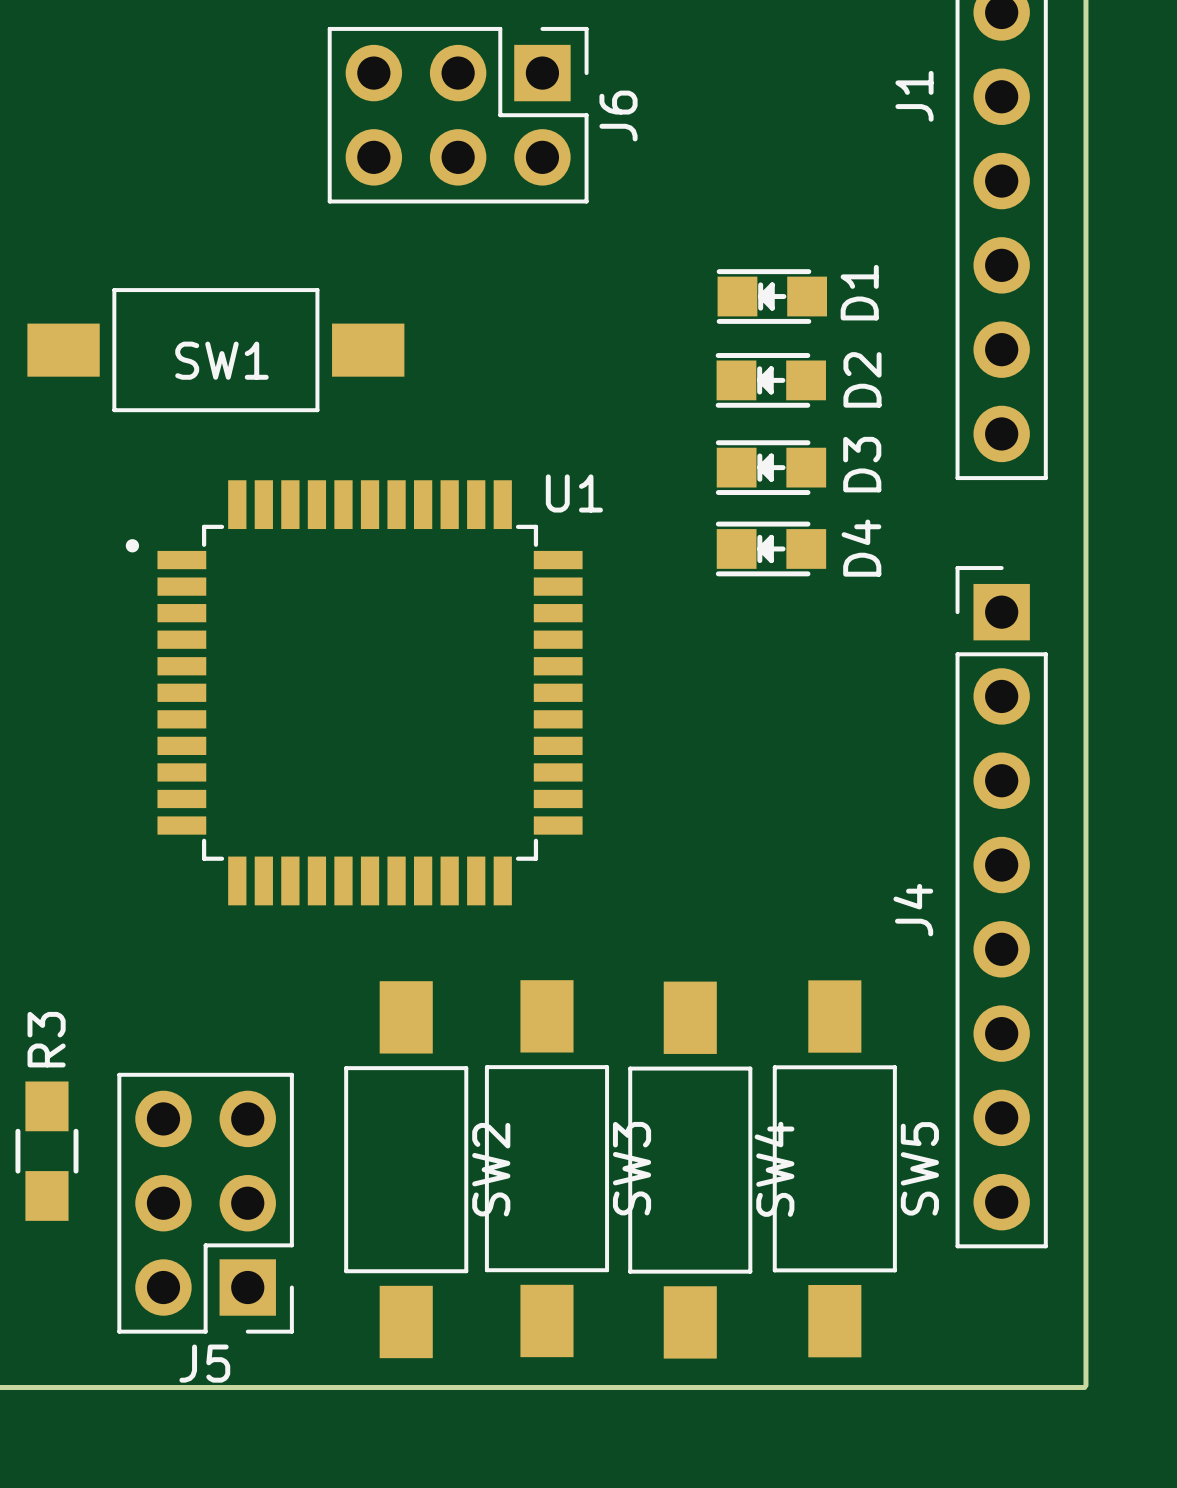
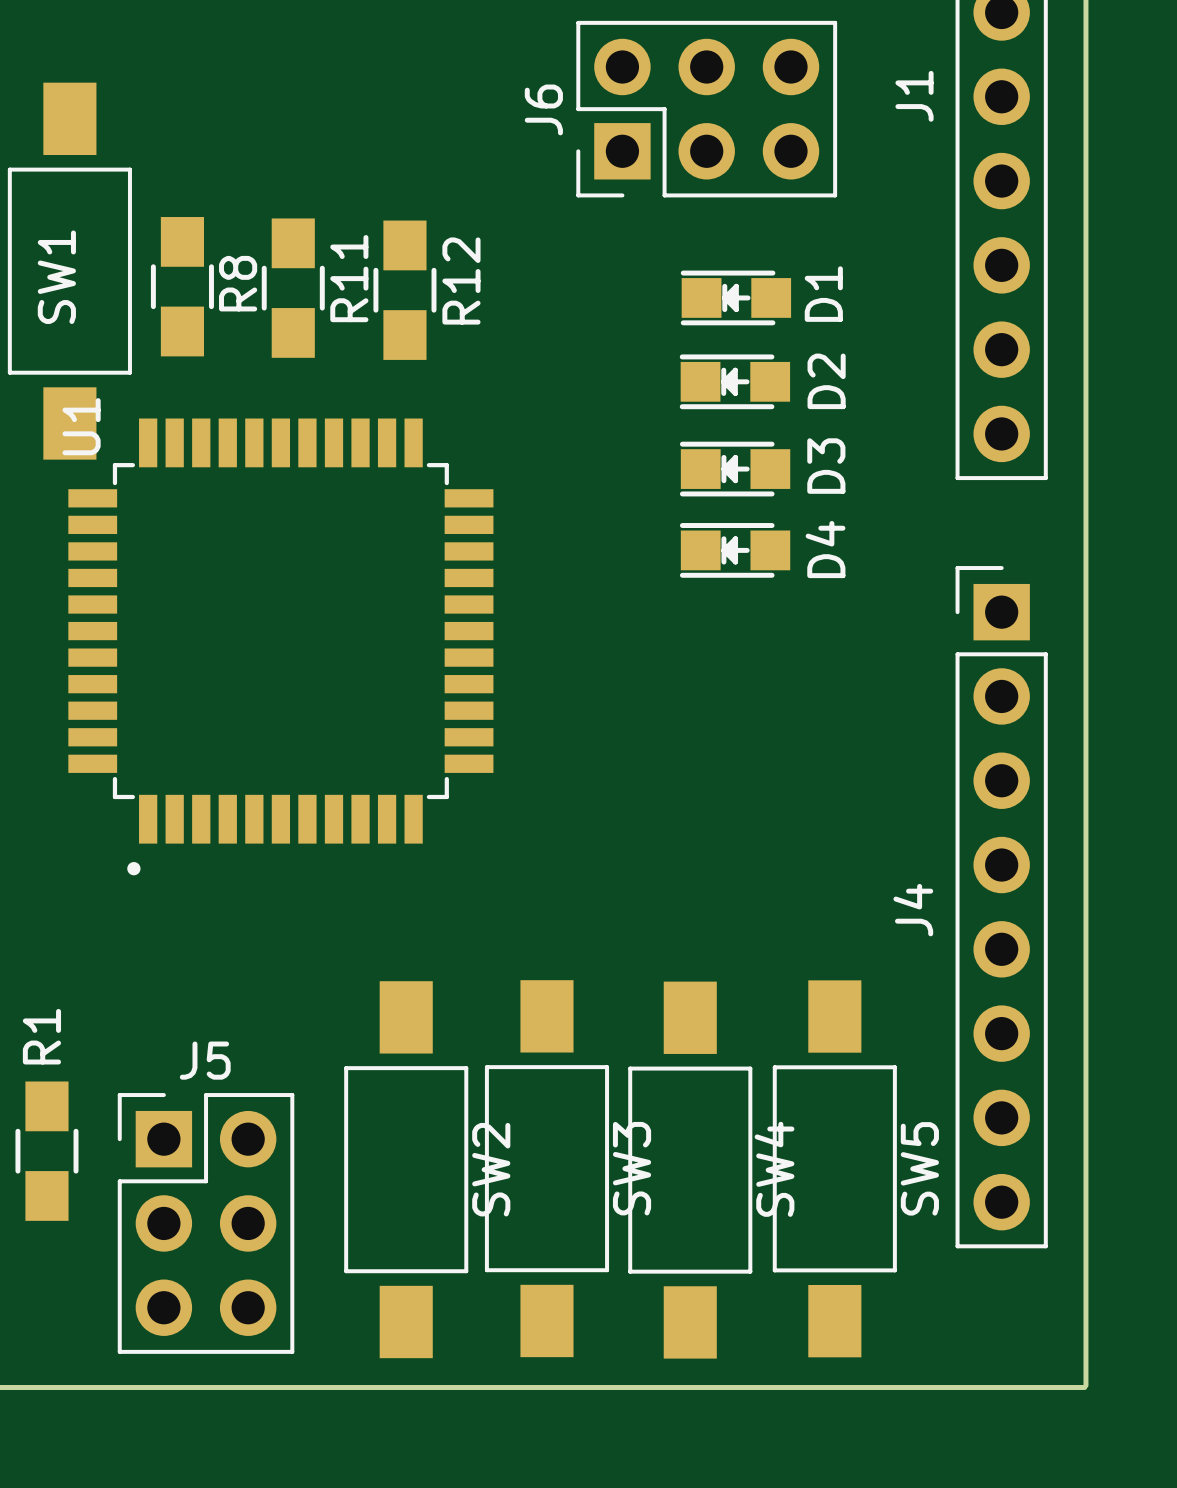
J6 rotation: 0° (458, 115) -> 180° (706, 109)
J6 position: (458, 115) -> (706, 109)
R8: none -> (182, 286)
R11: none -> (293, 288)
R12: none -> (404, 290)
D1 position: (771, 296) -> (735, 297)
SW1 rotation: 0° (215, 350) -> 90° clockwise (69, 271)
D2 position: (770, 380) -> (734, 381)
D3 position: (771, 467) -> (735, 469)
D4 position: (771, 548) -> (735, 550)
U1 rotation: 0° (354, 692) -> 90° counterclockwise (280, 646)
R3 name: R3 (46, 1039) -> R1 (41, 1036)
J5 rotation: 0° (205, 1203) -> 180° (206, 1223)

